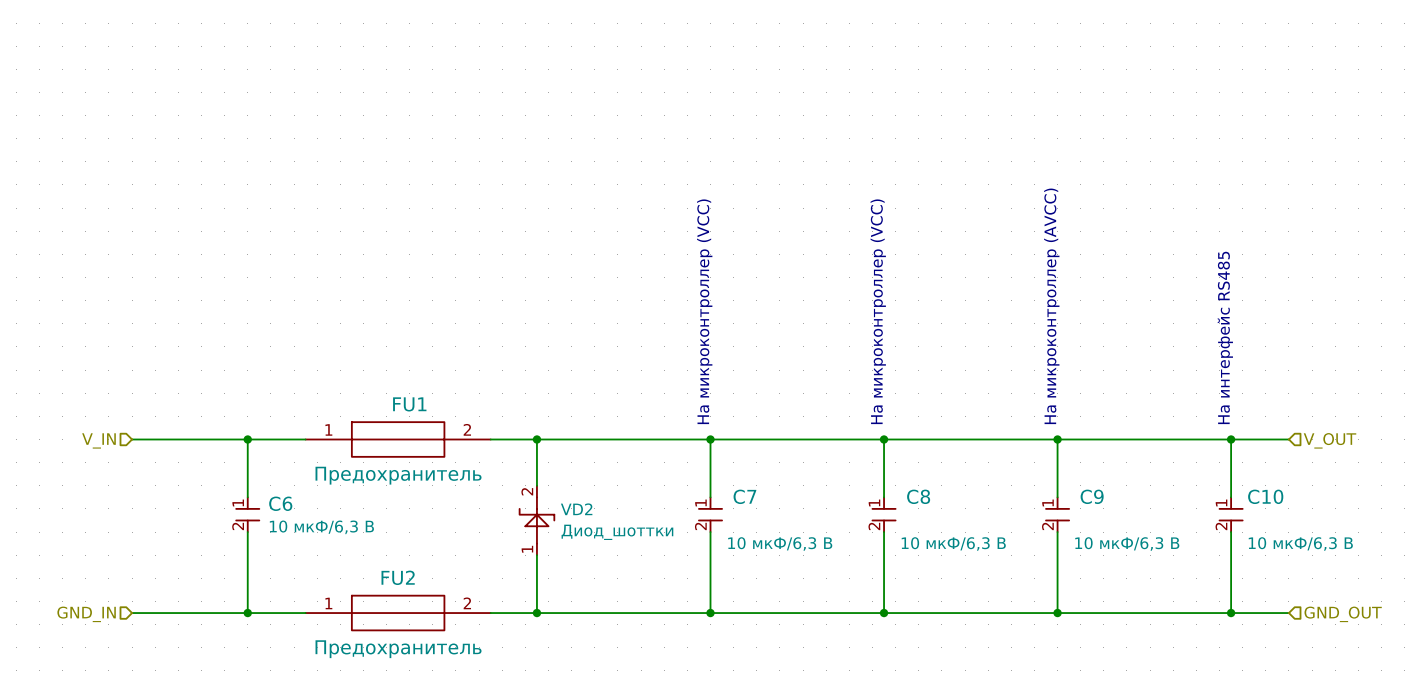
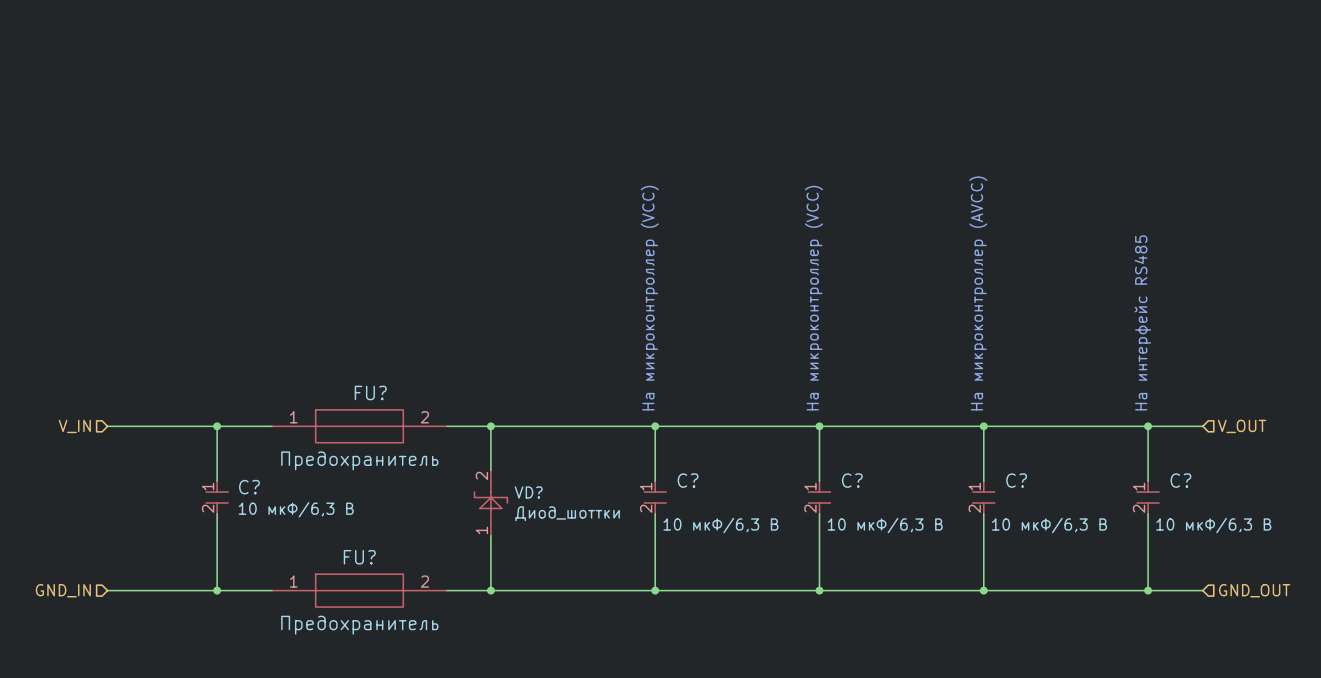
FU1 name: FU1 (409, 404) -> FU? (370, 392)
C7 name: C7 (744, 496) -> C? (688, 480)
C8 name: C8 (918, 496) -> C? (852, 480)
C9 name: C9 (1092, 496) -> C? (1016, 480)
C10 name: C10 (1265, 496) -> C? (1180, 480)
C6 name: C6 (280, 503) -> C? (249, 487)
VD2 name: VD2 (576, 509) -> VD? (528, 492)
FU2 name: FU2 (398, 577) -> FU? (359, 557)

